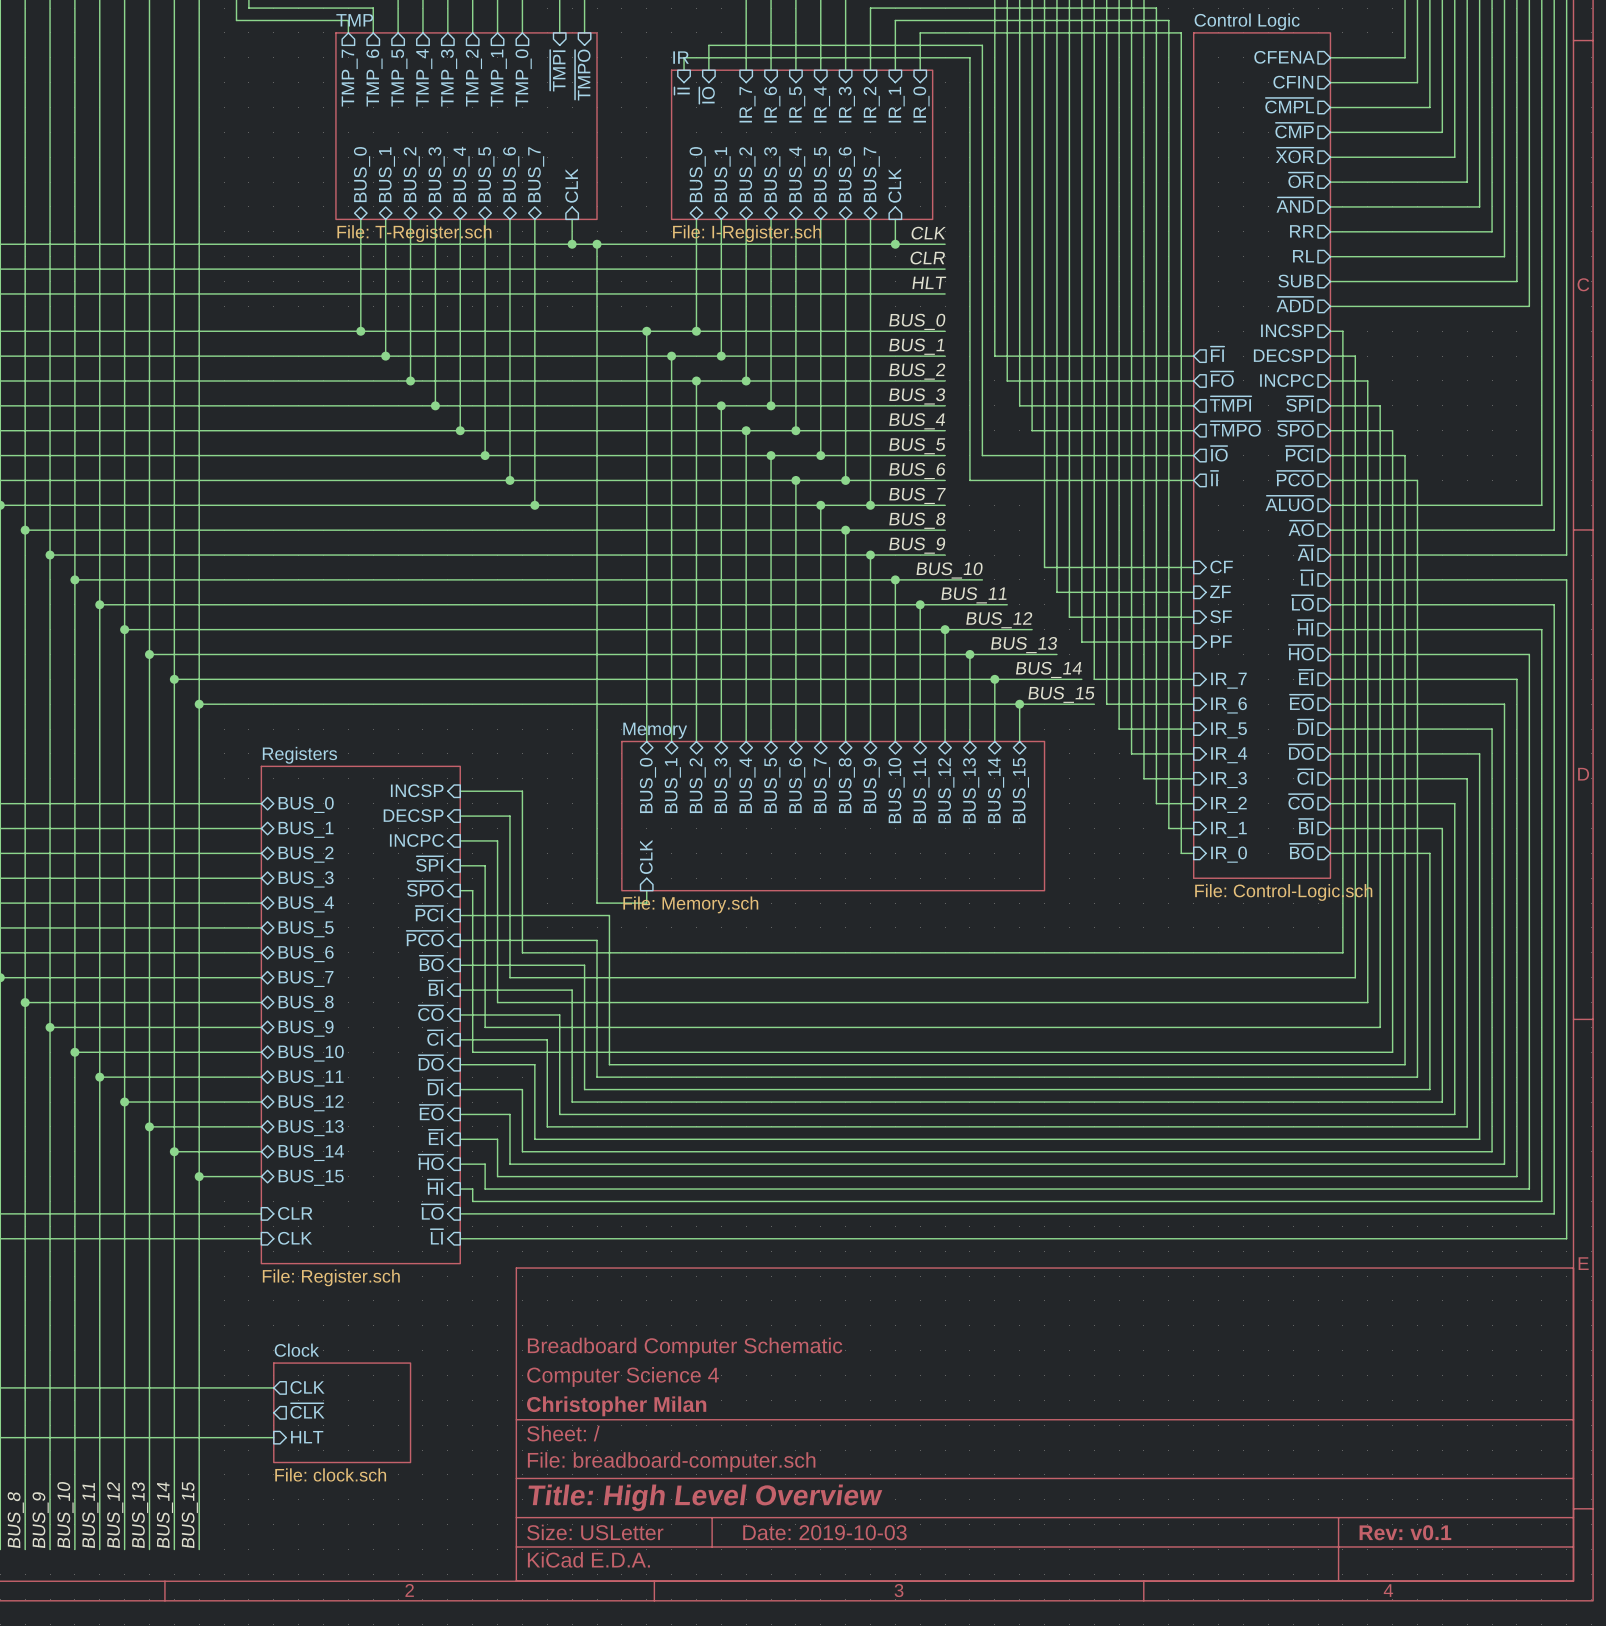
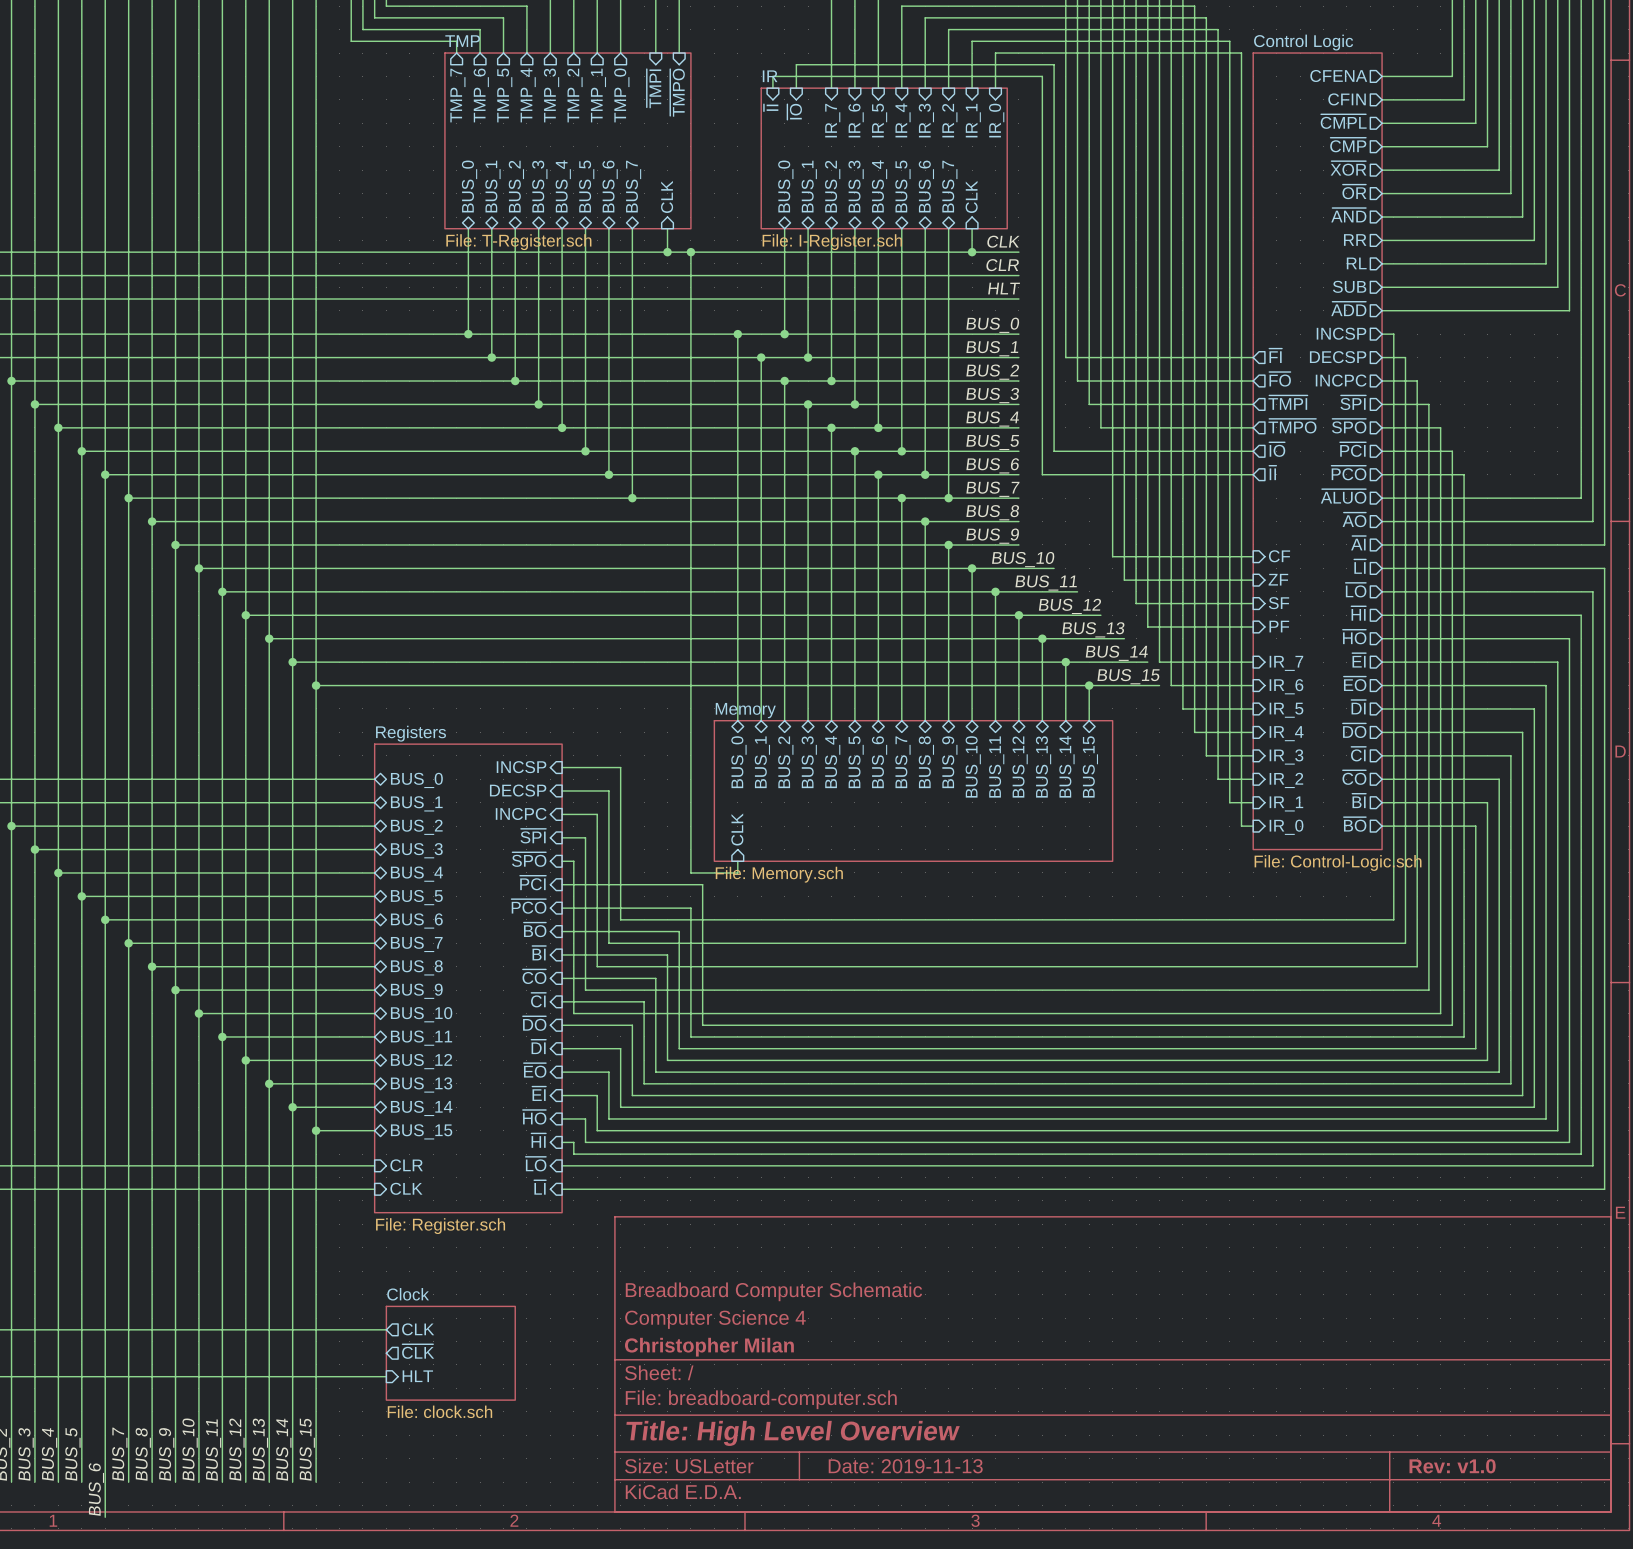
title block: Date: 2019-10-03 (824, 1532) -> Date: 2019-11-13 (905, 1466)
title block: Rev: v0.1 (1405, 1532) -> Rev: v1.0 (1452, 1466)

